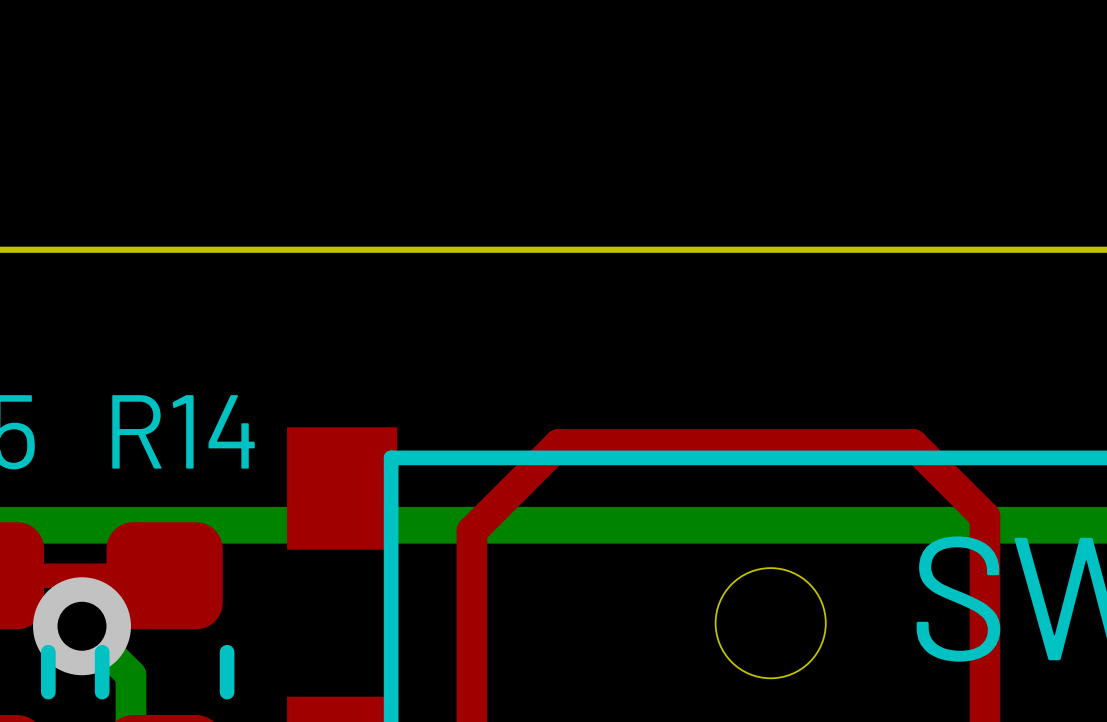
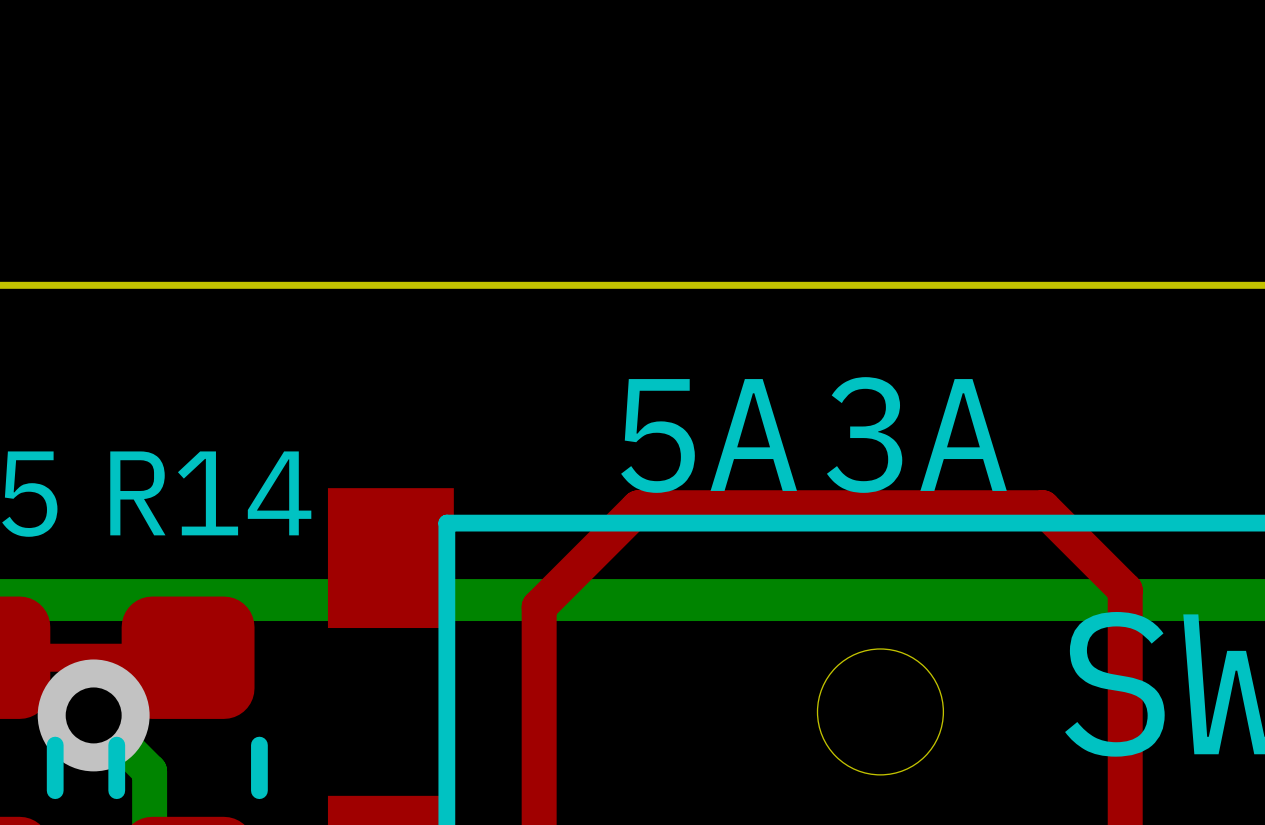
text: none -> 5A (709, 435)
text: none -> 3A (916, 435)

